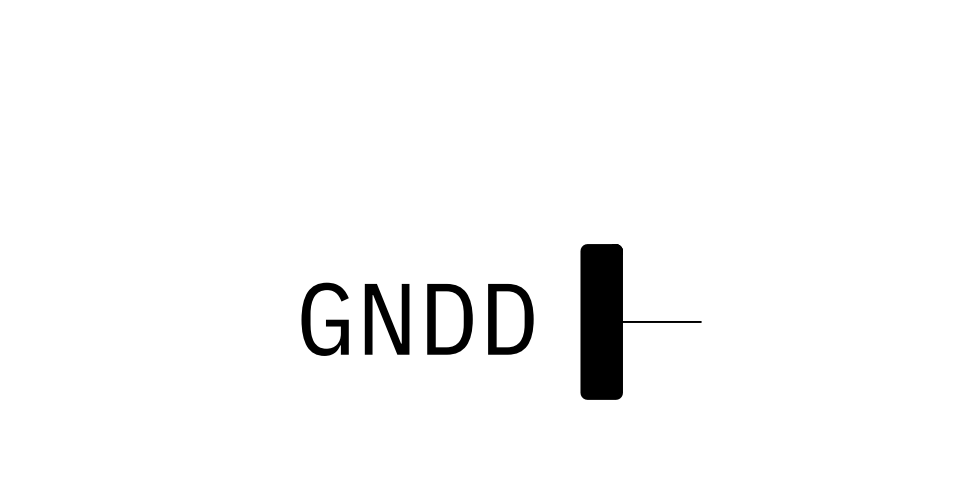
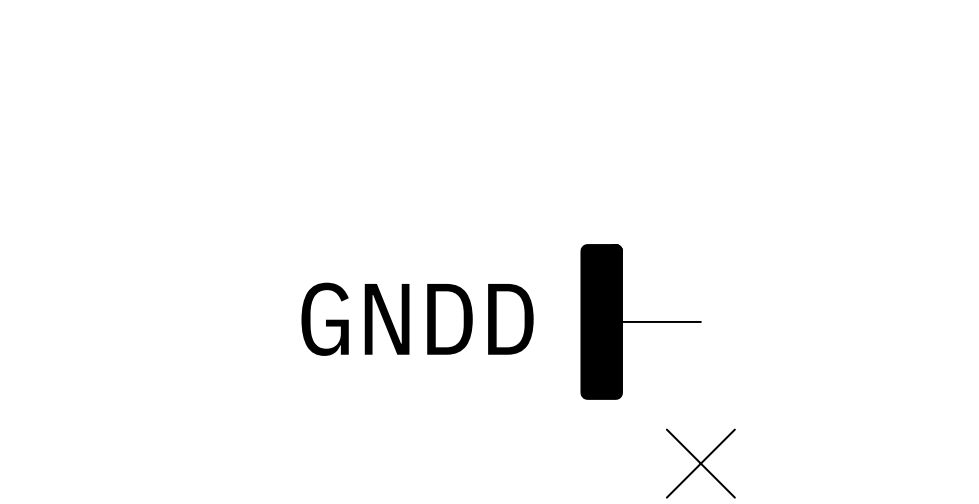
no-connect mark: none -> (700, 463)

